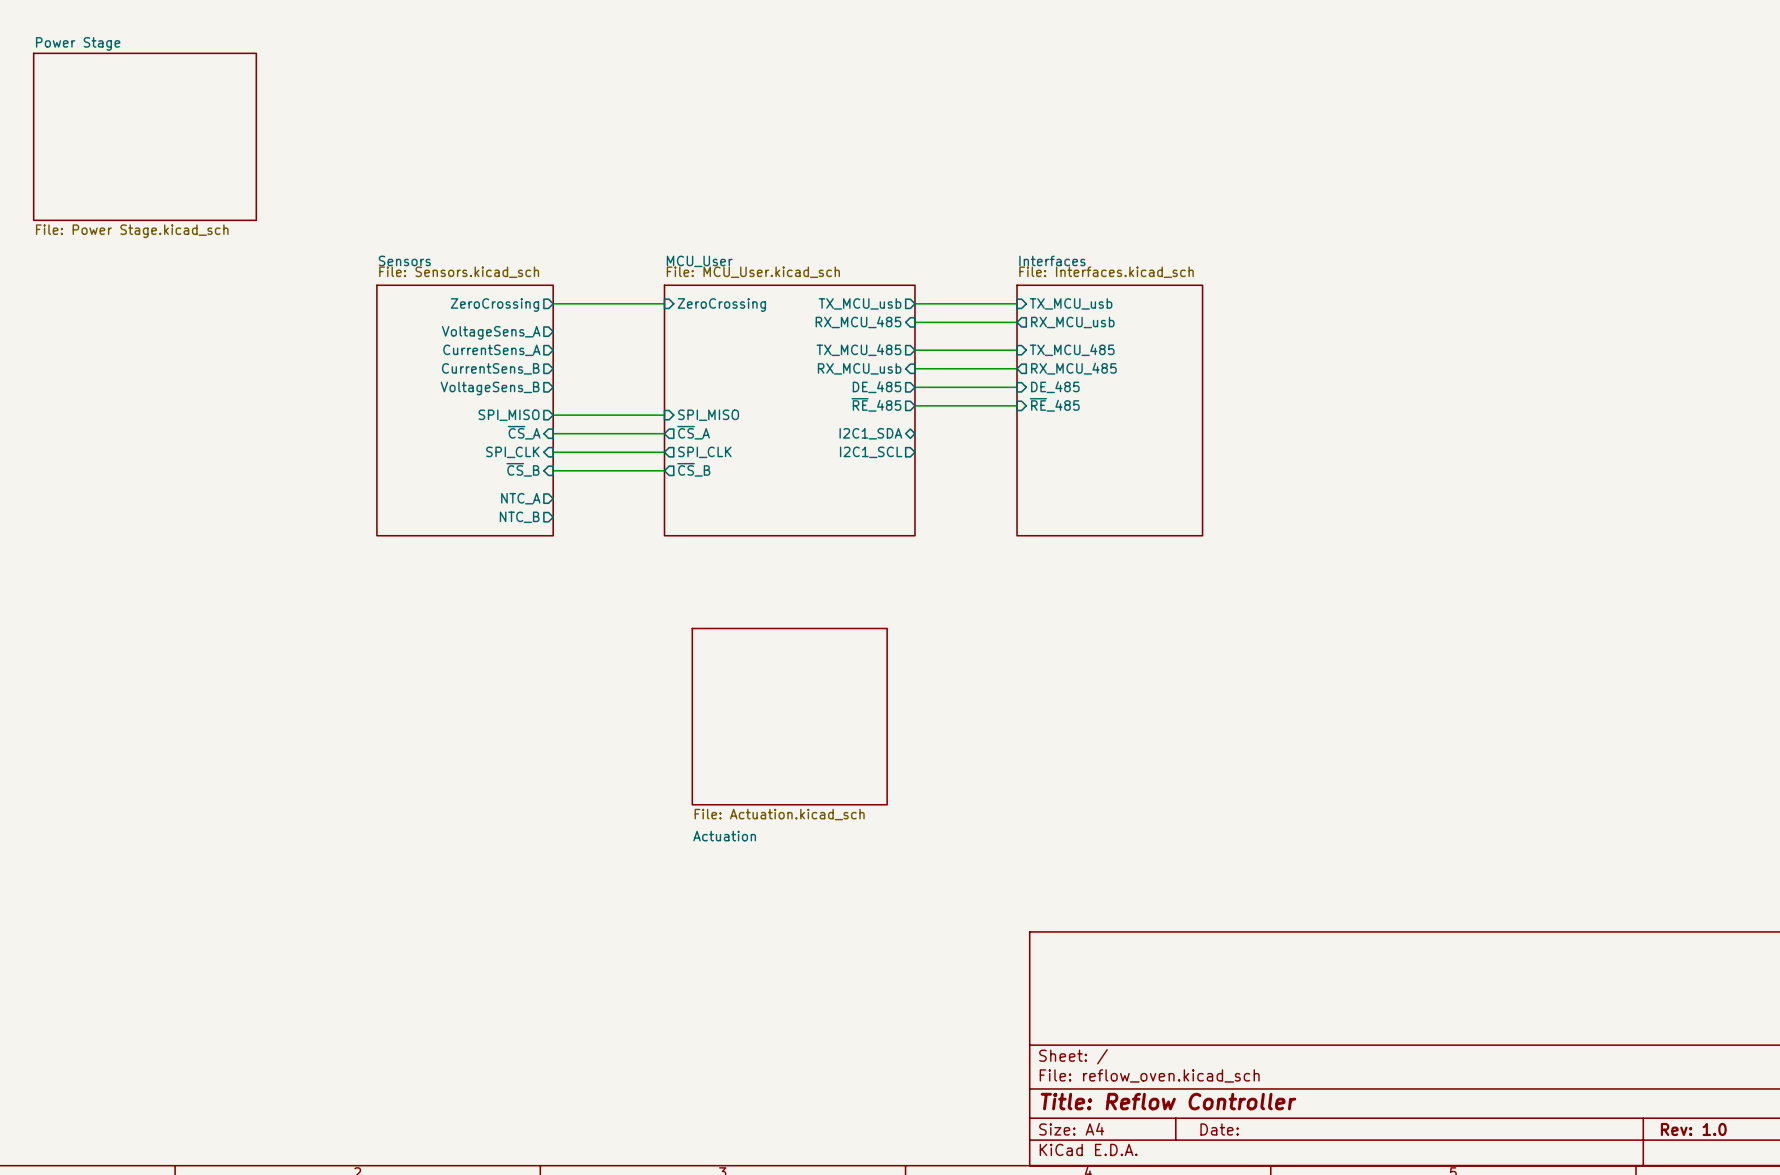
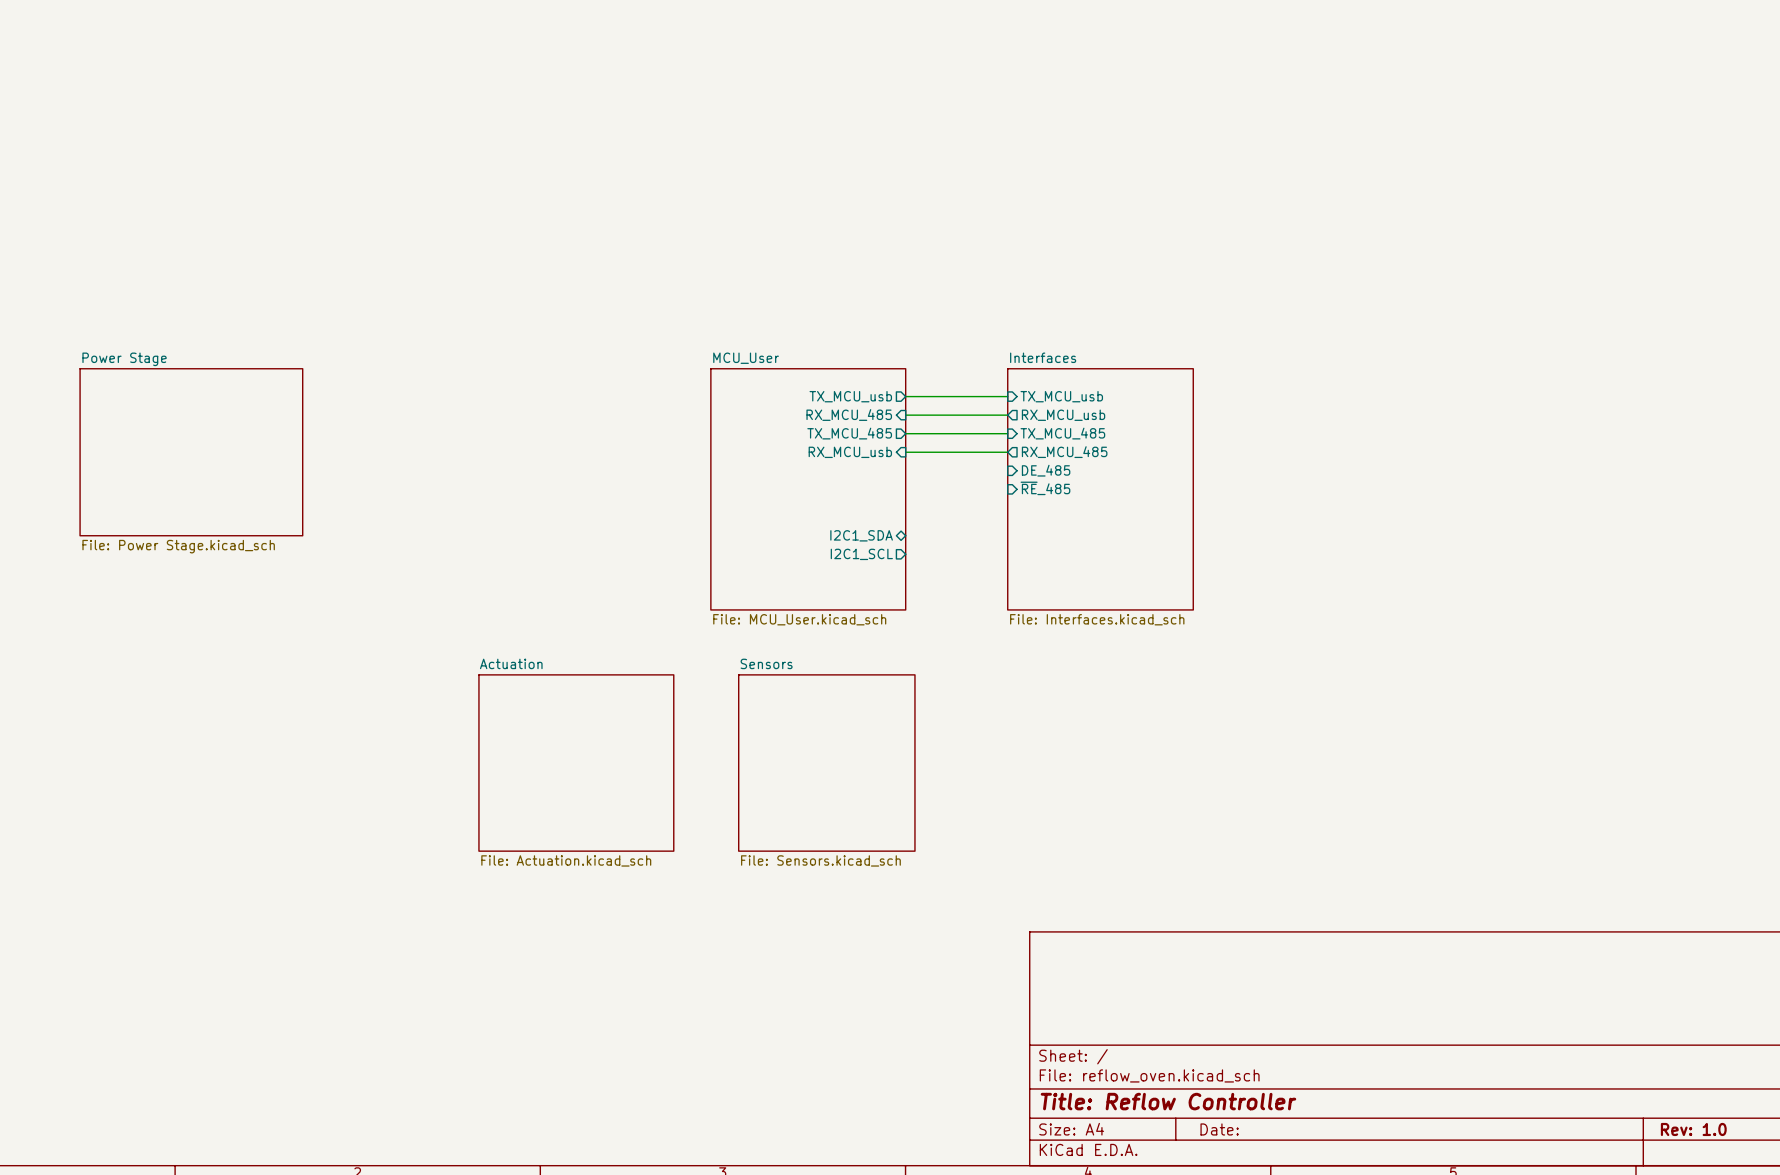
sheet Power Stage: File: Power Stage.kicad_sch (144, 136) -> none
wire: (553, 303) (664, 303) -> none
sheet pin: TX_MCU_usb (860, 303) -> none
wire: (914, 303) (1017, 303) -> none
sheet pin: TX_MCU_usb (1071, 303) -> none
sheet pin: ZeroCrossing (494, 305) -> none
sheet pin: ZeroCrossing (721, 305) -> none
sheet pin: RX_MCU_485 (858, 322) -> none
wire: (914, 322) (1017, 322) -> none
sheet pin: RX_MCU_usb (1072, 322) -> none
sheet pin: VoltageSens_A (491, 332) -> none
sheet pin: CurrentSens_A (491, 350) -> none
sheet pin: TX_MCU_485 (858, 350) -> none
wire: (914, 350) (1017, 350) -> (905, 396) (1007, 396)
sheet pin: TX_MCU_485 (1072, 350) -> none
sheet pin: CurrentSens_B (490, 368) -> none
sheet pin: RX_MCU_usb (859, 368) -> none
wire: (914, 368) (1017, 368) -> (905, 415) (1007, 415)
sheet pin: RX_MCU_485 (1073, 368) -> none
sheet pin: DE_485 (877, 387) -> none
wire: (914, 387) (1017, 387) -> (905, 433) (1007, 433)
sheet pin: DE_485 (1055, 387) -> none
sheet pin: VoltageSens_B (490, 388) -> none
sheet pin: none -> TX_MCU_usb (850, 396)
sheet pin: none -> TX_MCU_usb (1061, 396)
sheet pin: ~{RE}_485 (876, 404) -> none
sheet pin: ~{RE}_485 (1054, 404) -> none
wire: (914, 405) (1017, 405) -> (905, 452) (1007, 452)
sheet Sensors: File: Sensors.kicad_sch (465, 410) -> none
sheet MCU_User: File: MCU_User.kicad_sch (789, 410) -> none
sheet Interfaces: File: Interfaces.kicad_sch (1109, 410) -> none
sheet pin: SPI_MISO (509, 415) -> none
wire: (553, 415) (664, 415) -> none
sheet pin: SPI_MISO (708, 415) -> none
sheet pin: none -> RX_MCU_485 (849, 415)
sheet pin: none -> RX_MCU_usb (1063, 415)
sheet pin: ~{CS}_A (524, 432) -> none
sheet pin: ~{CS}_A (693, 432) -> none
wire: (553, 433) (664, 433) -> none
sheet pin: none -> TX_MCU_485 (849, 433)
sheet pin position: I2C1_SDA (870, 433) -> I2C1_SDA (861, 535)
sheet pin: none -> TX_MCU_485 (1062, 433)
sheet Power Stage: none -> File: Power Stage.kicad_sch (191, 452)
sheet pin: SPI_CLK (512, 452) -> none
wire: (553, 452) (664, 452) -> none
sheet pin: SPI_CLK (704, 452) -> none
sheet pin: none -> RX_MCU_usb (850, 452)
sheet pin position: I2C1_SCL (871, 452) -> I2C1_SCL (861, 554)
sheet pin: none -> RX_MCU_485 (1064, 452)
sheet pin: ~{CS}_B (523, 469) -> none
sheet pin: ~{CS}_B (693, 469) -> none
wire: (553, 470) (664, 470) -> none
sheet pin: none -> DE_485 (1046, 470)
sheet pin: none -> ~{RE}_485 (1045, 488)
sheet MCU_User: none -> File: MCU_User.kicad_sch (808, 489)
sheet Interfaces: none -> File: Interfaces.kicad_sch (1100, 489)
sheet pin: NTC_A (520, 498) -> none
sheet pin: NTC_B (519, 517) -> none
sheet Actuation: File: Actuation.kicad_sch (789, 716) -> none
sheet Actuation: none -> File: Actuation.kicad_sch (576, 763)
sheet Sensors: none -> File: Sensors.kicad_sch (826, 763)

